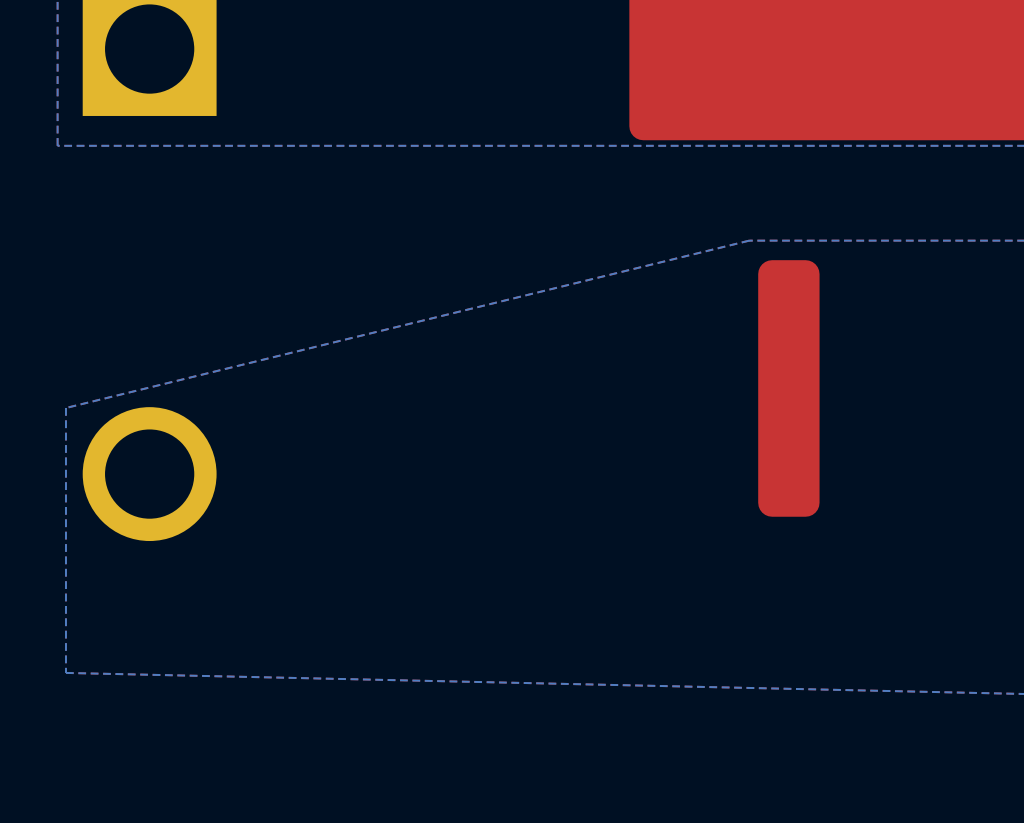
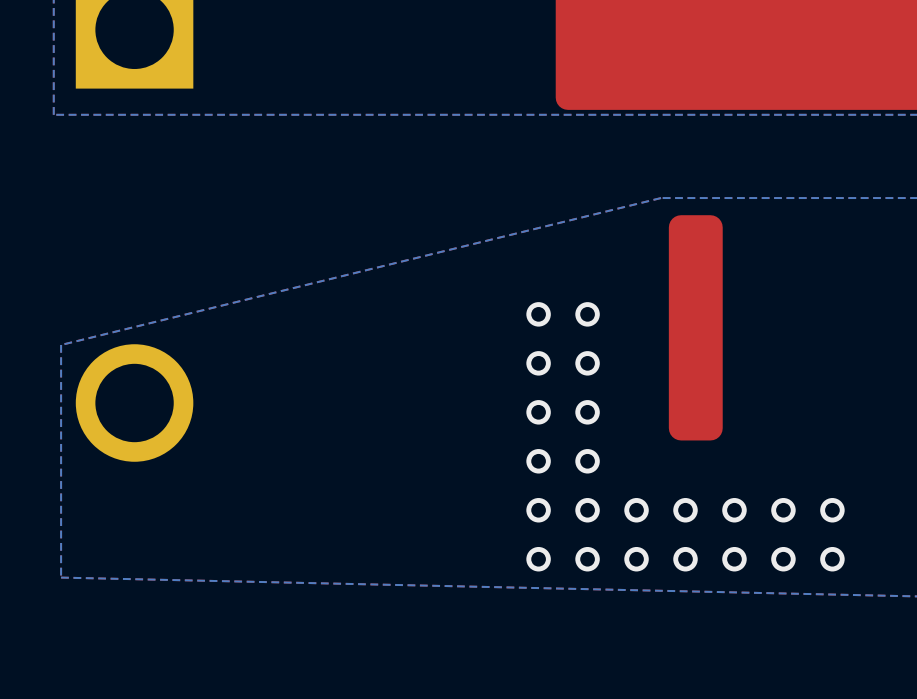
via: none -> (538, 314)
via: none -> (587, 314)
via: none -> (538, 363)
via: none -> (587, 363)
via: none -> (538, 412)
via: none -> (587, 412)
via: none -> (538, 461)
via: none -> (587, 461)
via: none -> (538, 510)
via: none -> (587, 510)
via: none -> (636, 510)
via: none -> (685, 510)
via: none -> (734, 510)
via: none -> (783, 510)
via: none -> (832, 510)
via: none -> (538, 559)
via: none -> (587, 559)
via: none -> (636, 559)
via: none -> (685, 559)
via: none -> (734, 559)
via: none -> (783, 559)
via: none -> (832, 559)

